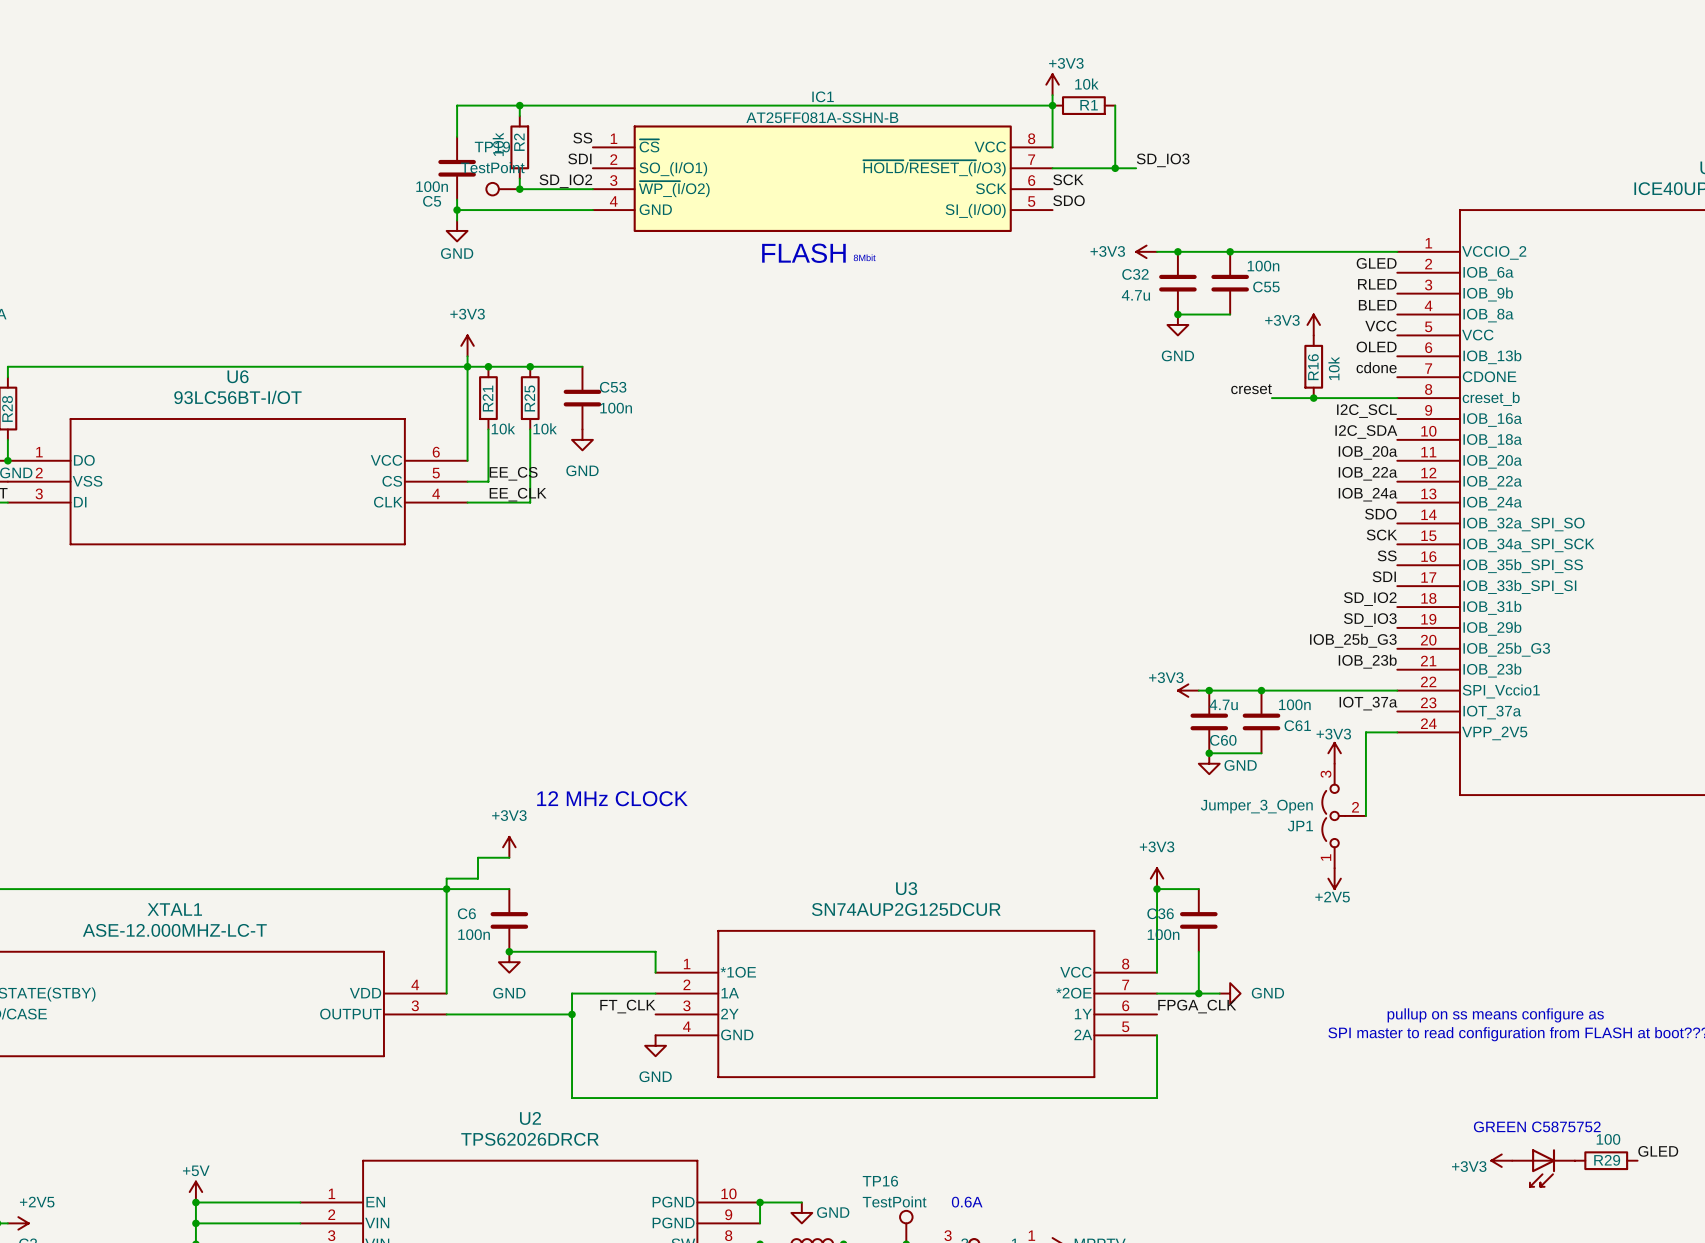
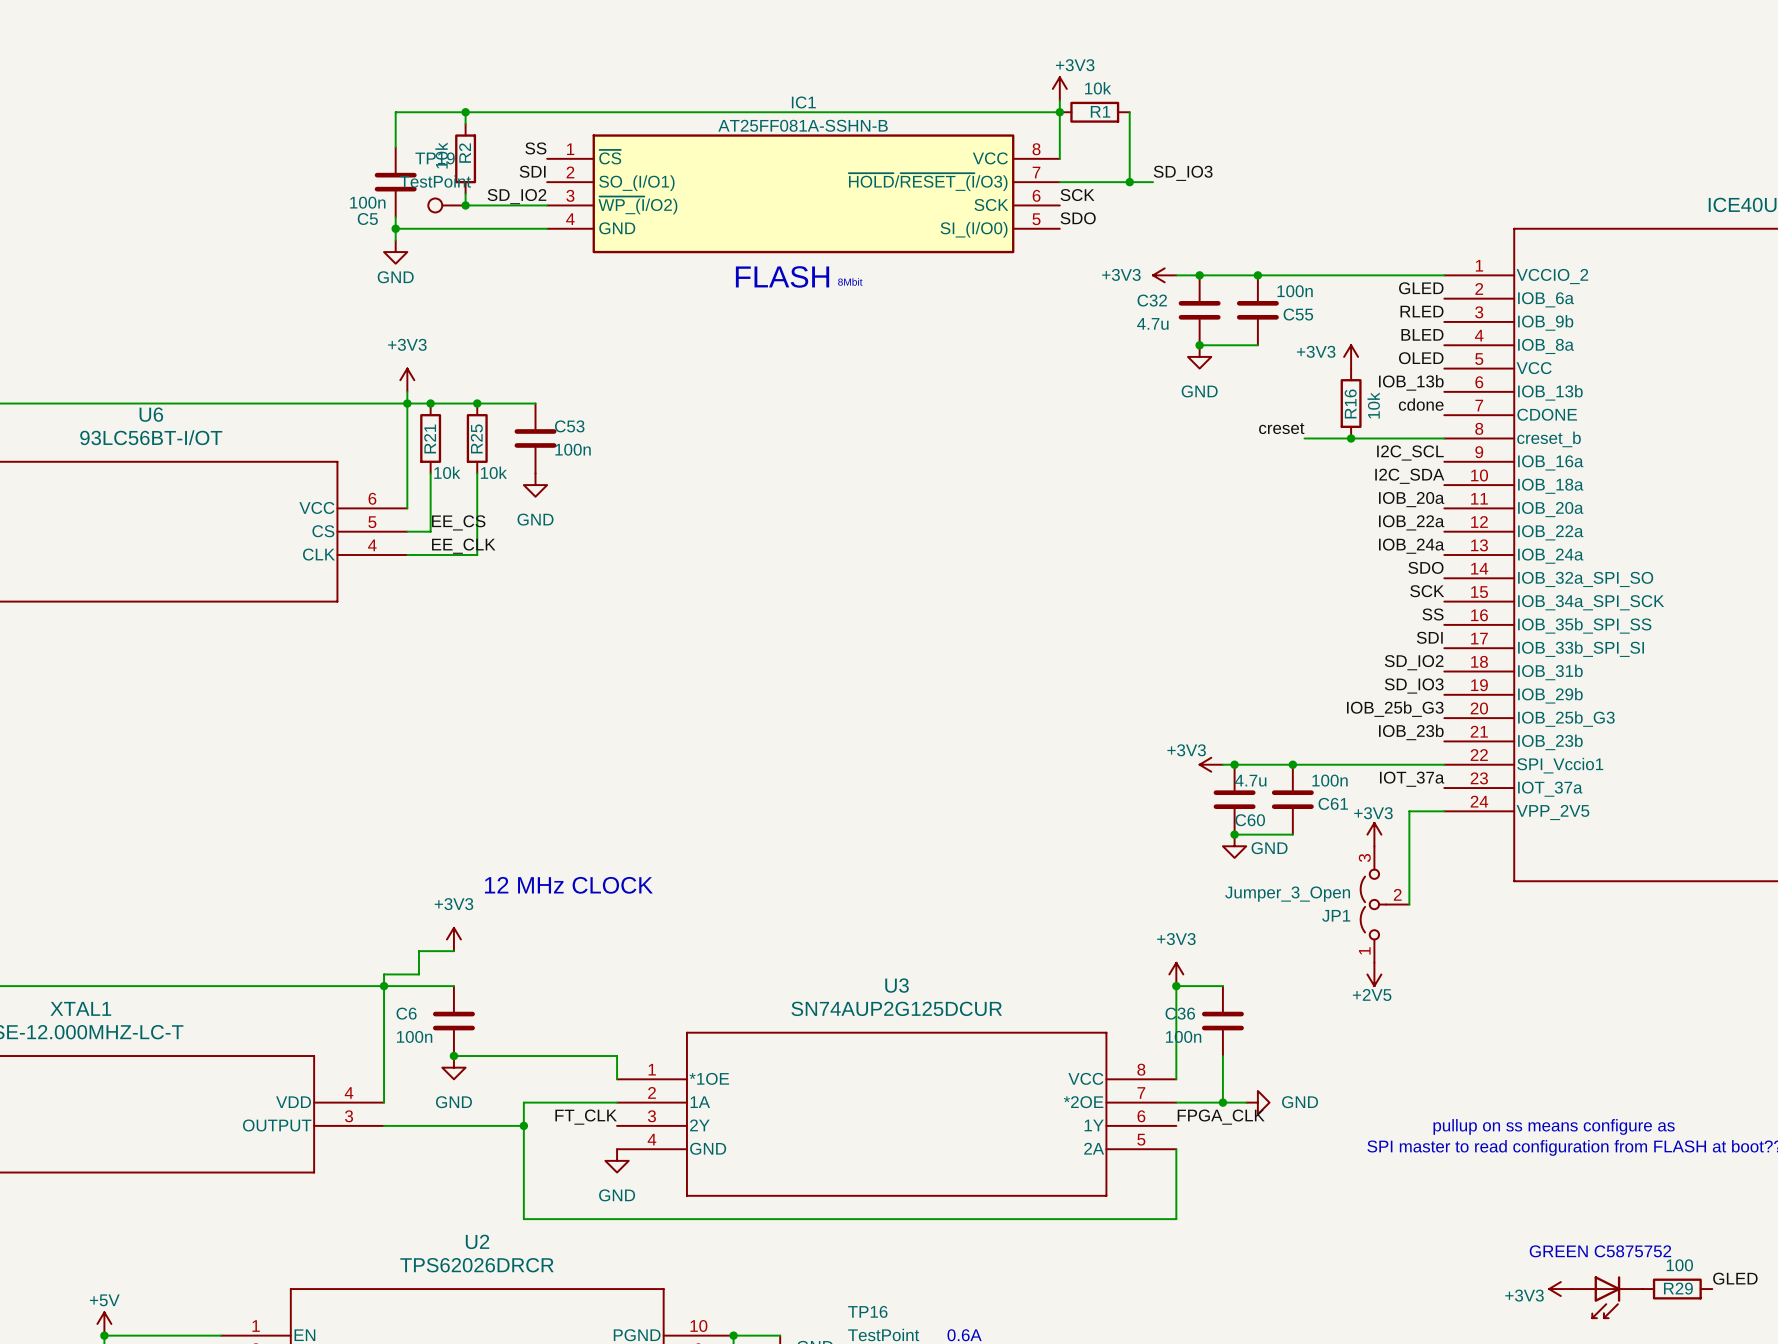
label: VCC (1381, 326) -> OLED (1421, 358)
label: OLED (1376, 346) -> IOB_13b (1411, 382)

